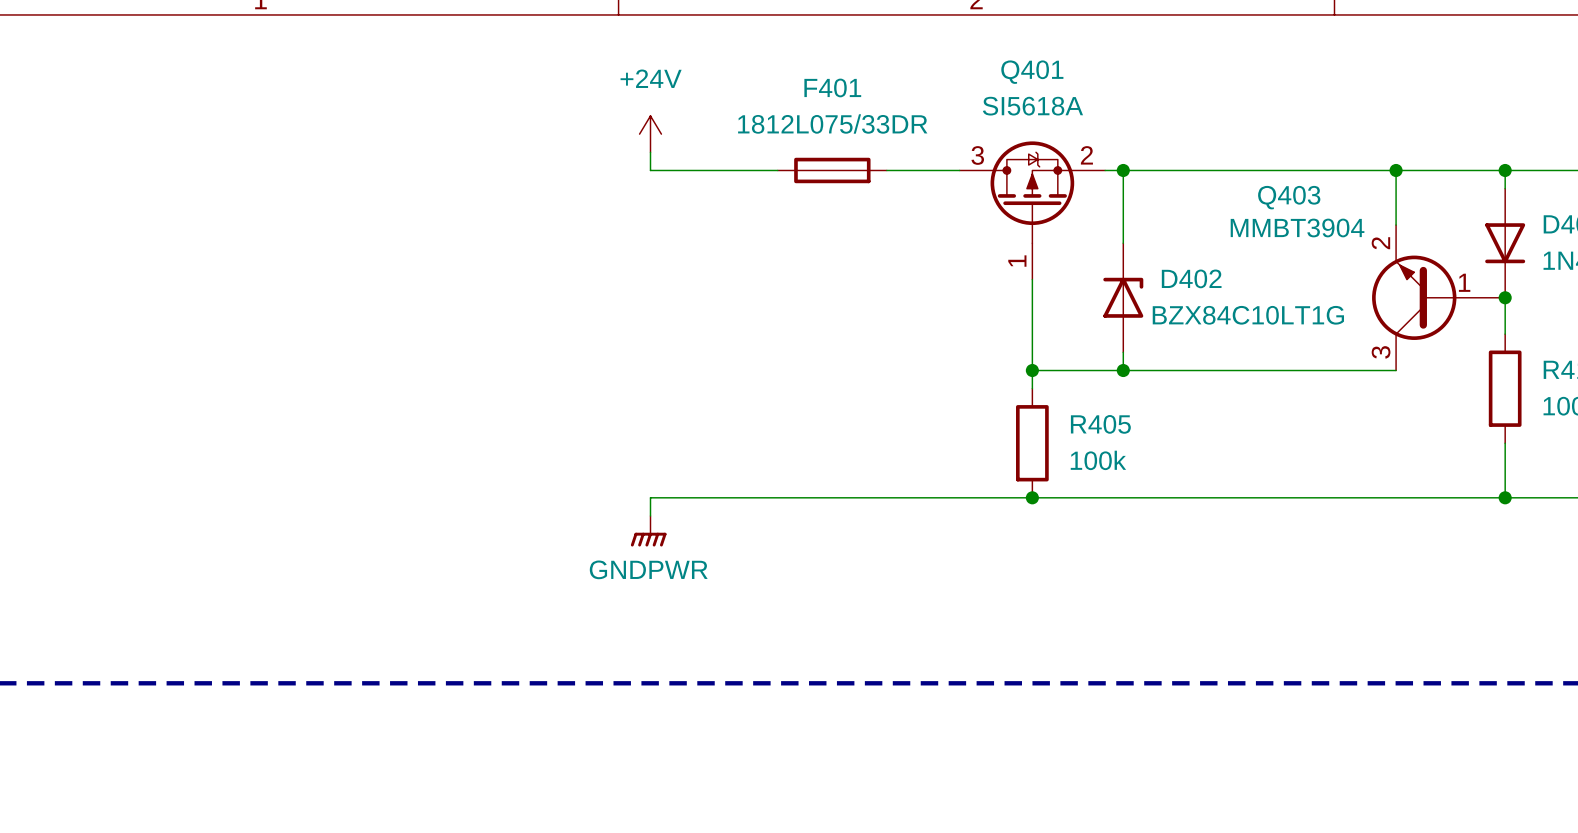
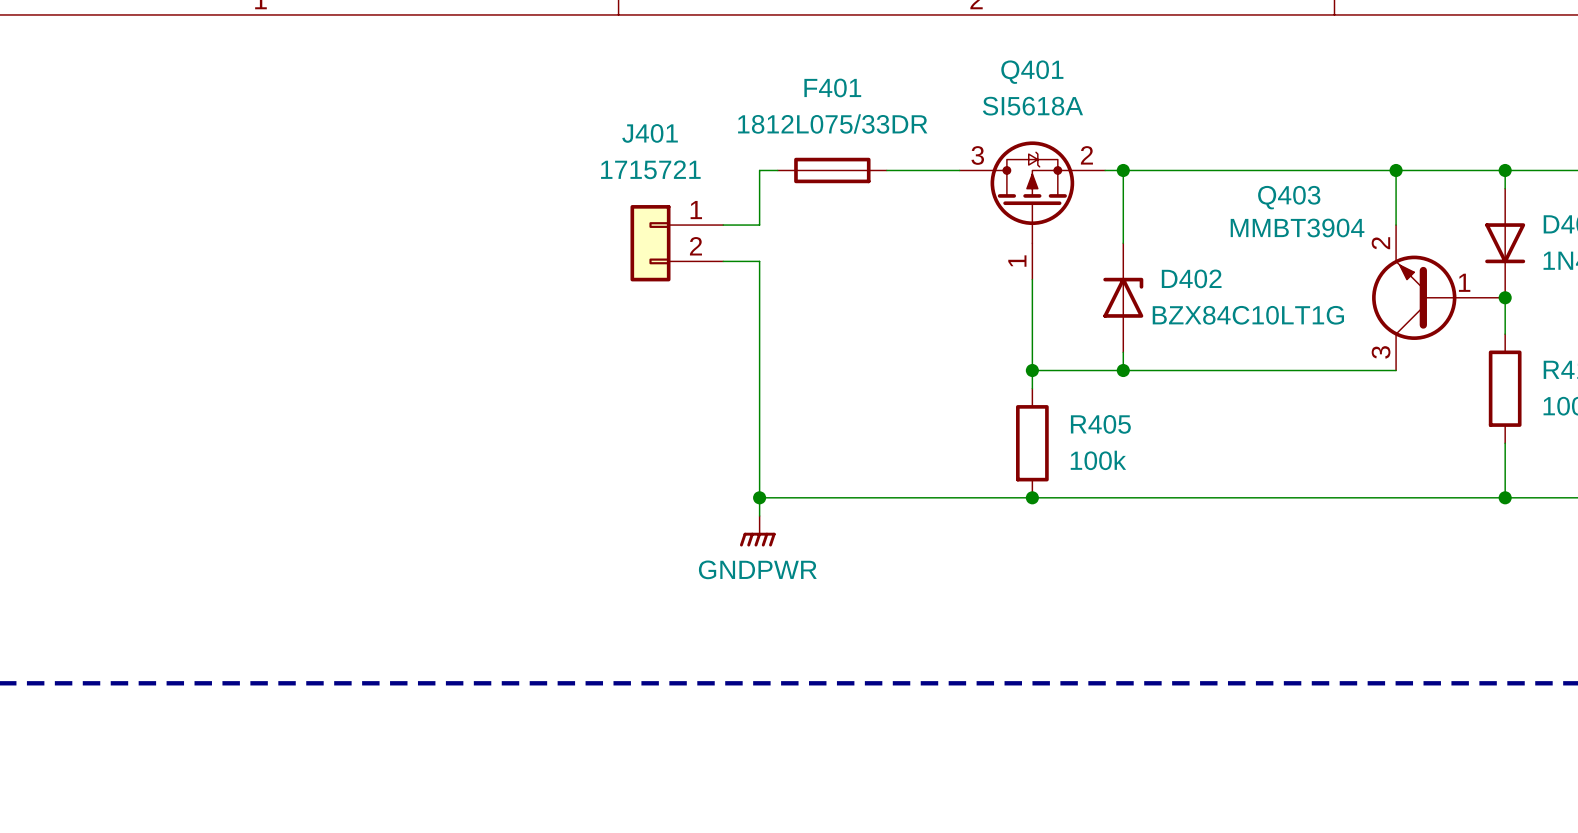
power symbol: +24V (650, 134) -> none
wire: (650, 152) (650, 170) (759, 170) -> (723, 225) (759, 225) (759, 170)
J401: none -> 1715721 (676, 243)
wire: none -> (723, 261) (759, 261) (759, 515)
wire: (759, 497) (650, 497) (650, 515) -> none
junction: none -> (759, 497)
power symbol position: GNDPWR (648, 531) -> GNDPWR (757, 531)

